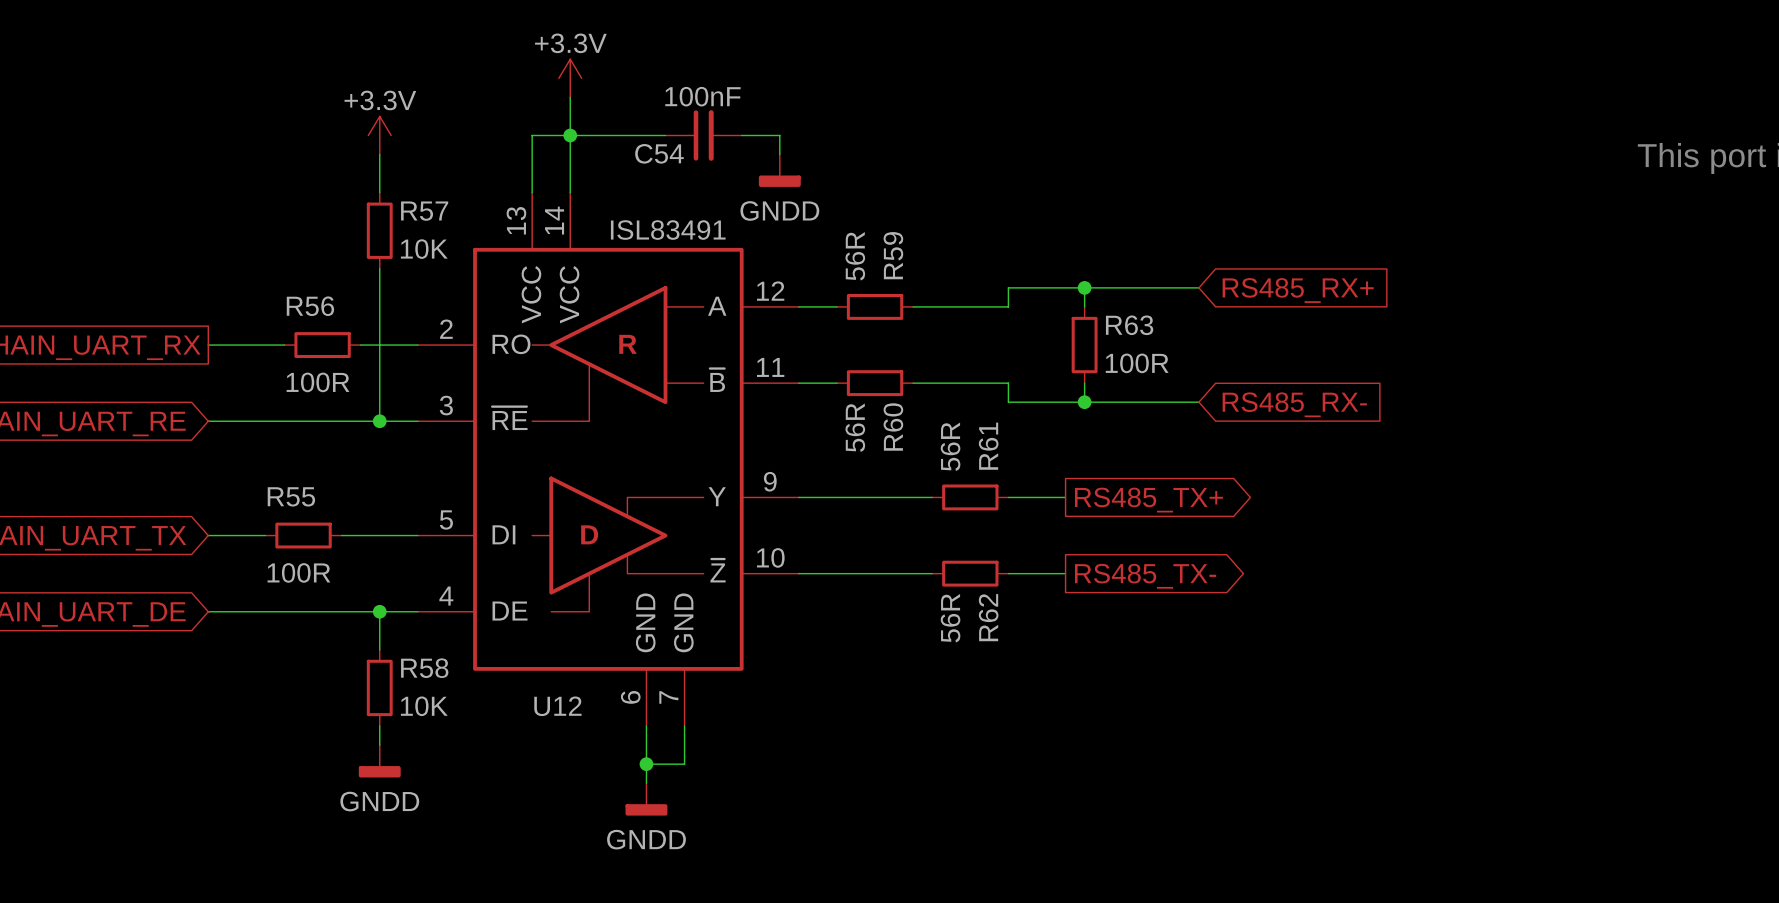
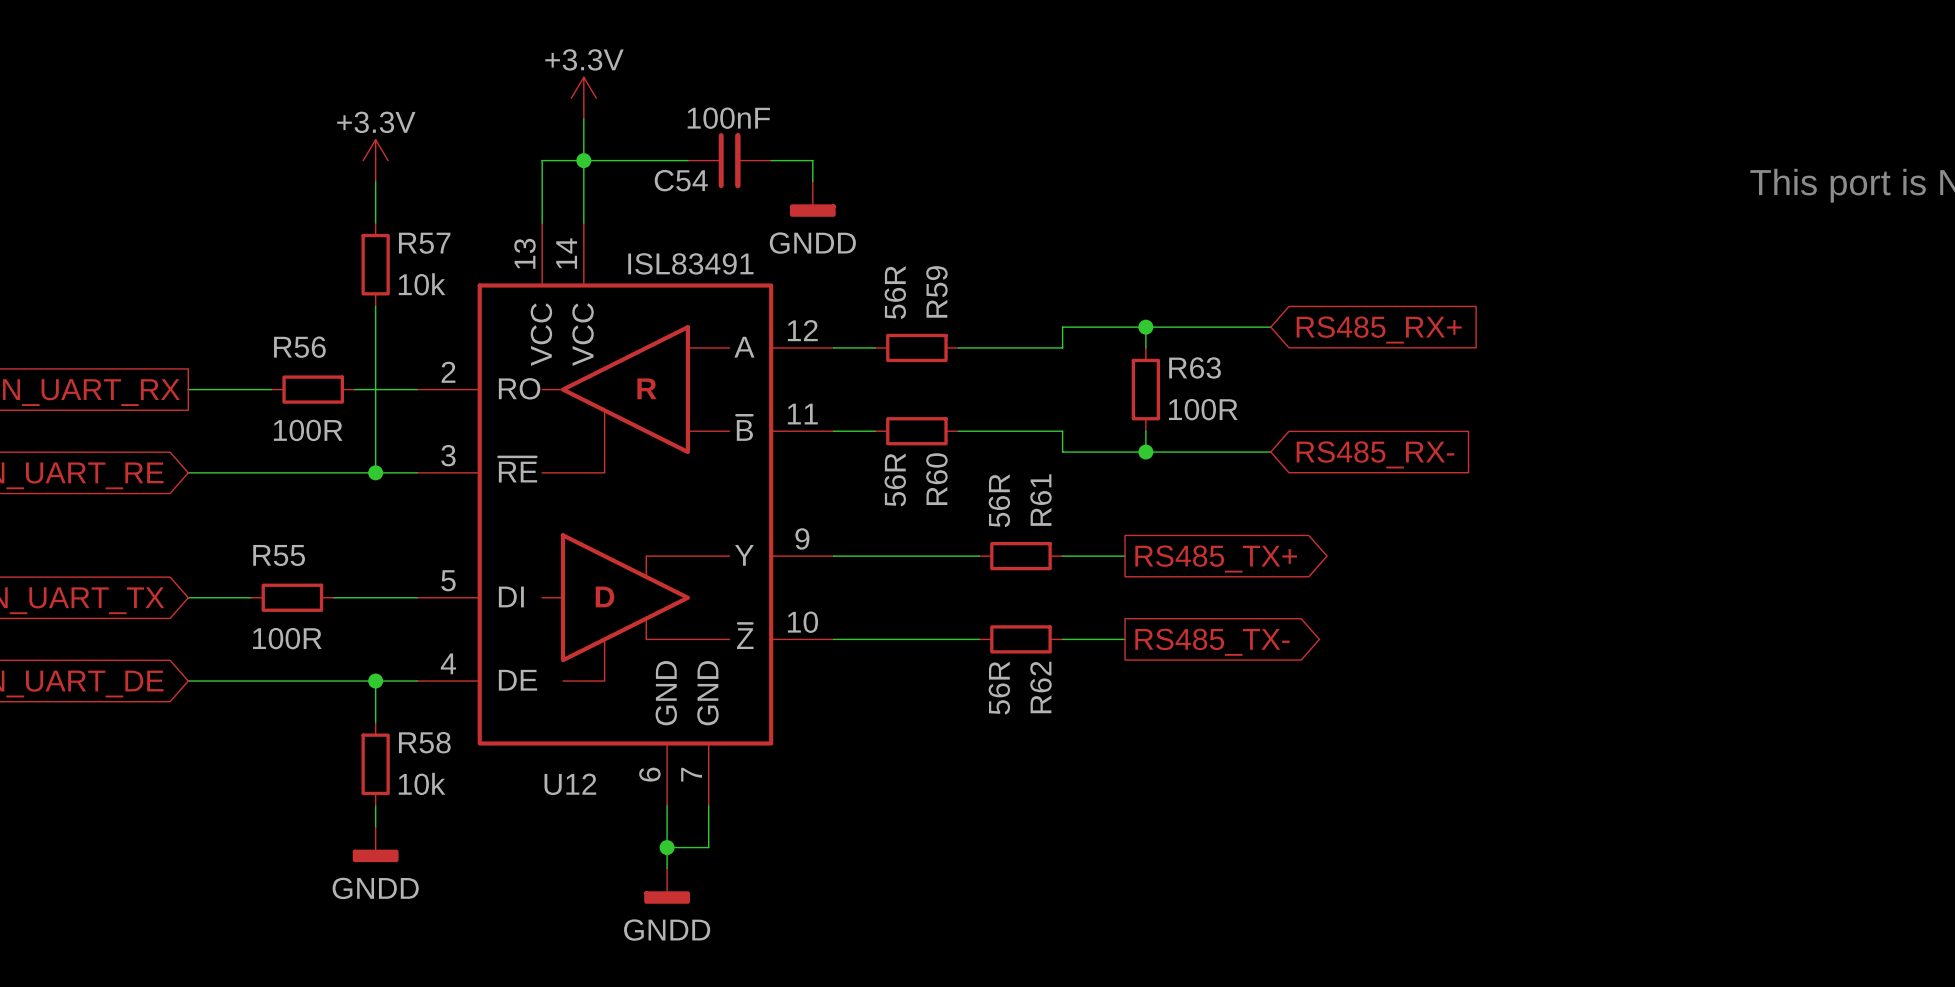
R57 value: 10K (424, 249) -> 10k (422, 284)
R58 value: 10K (424, 706) -> 10k (422, 783)

